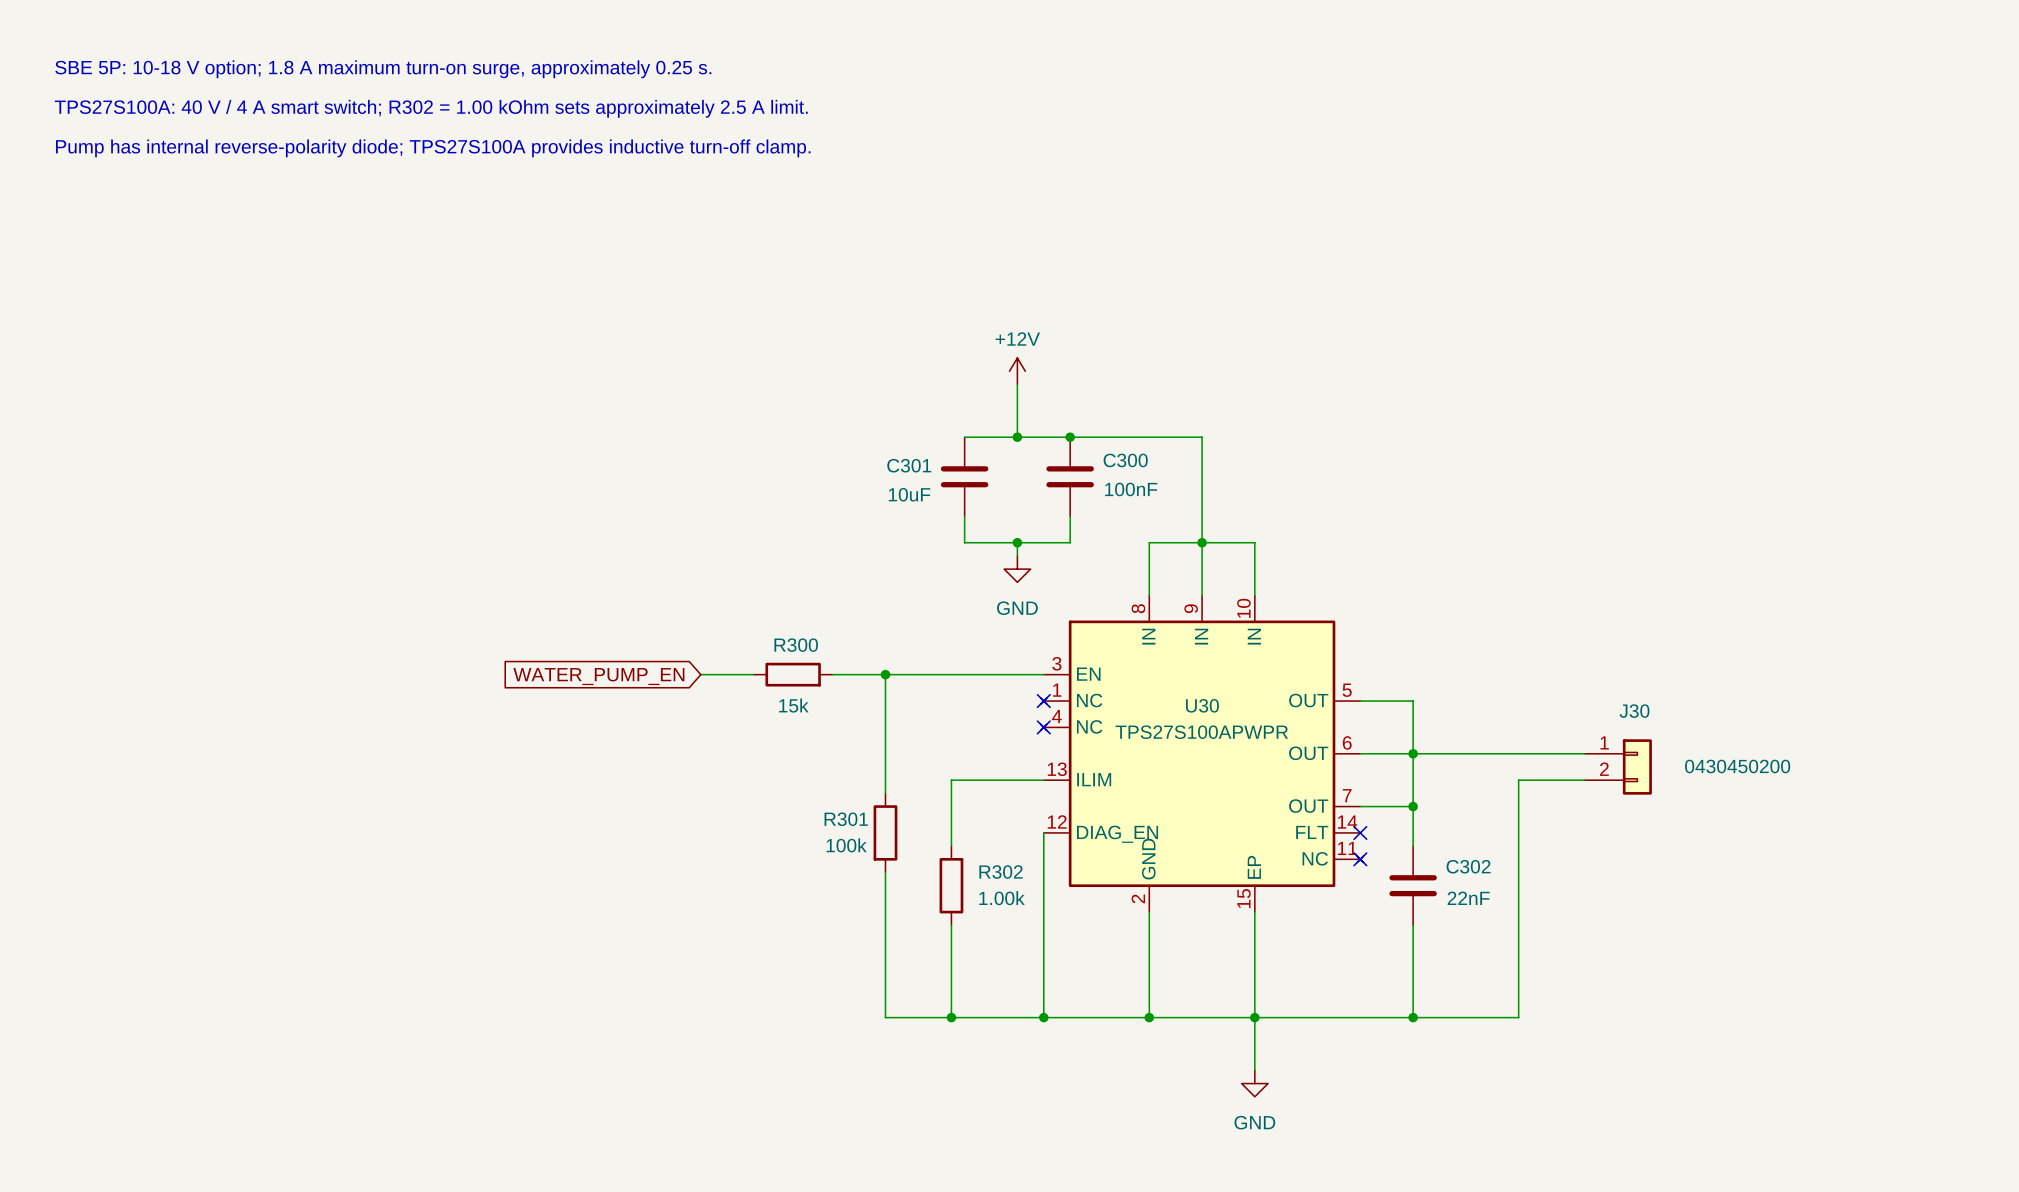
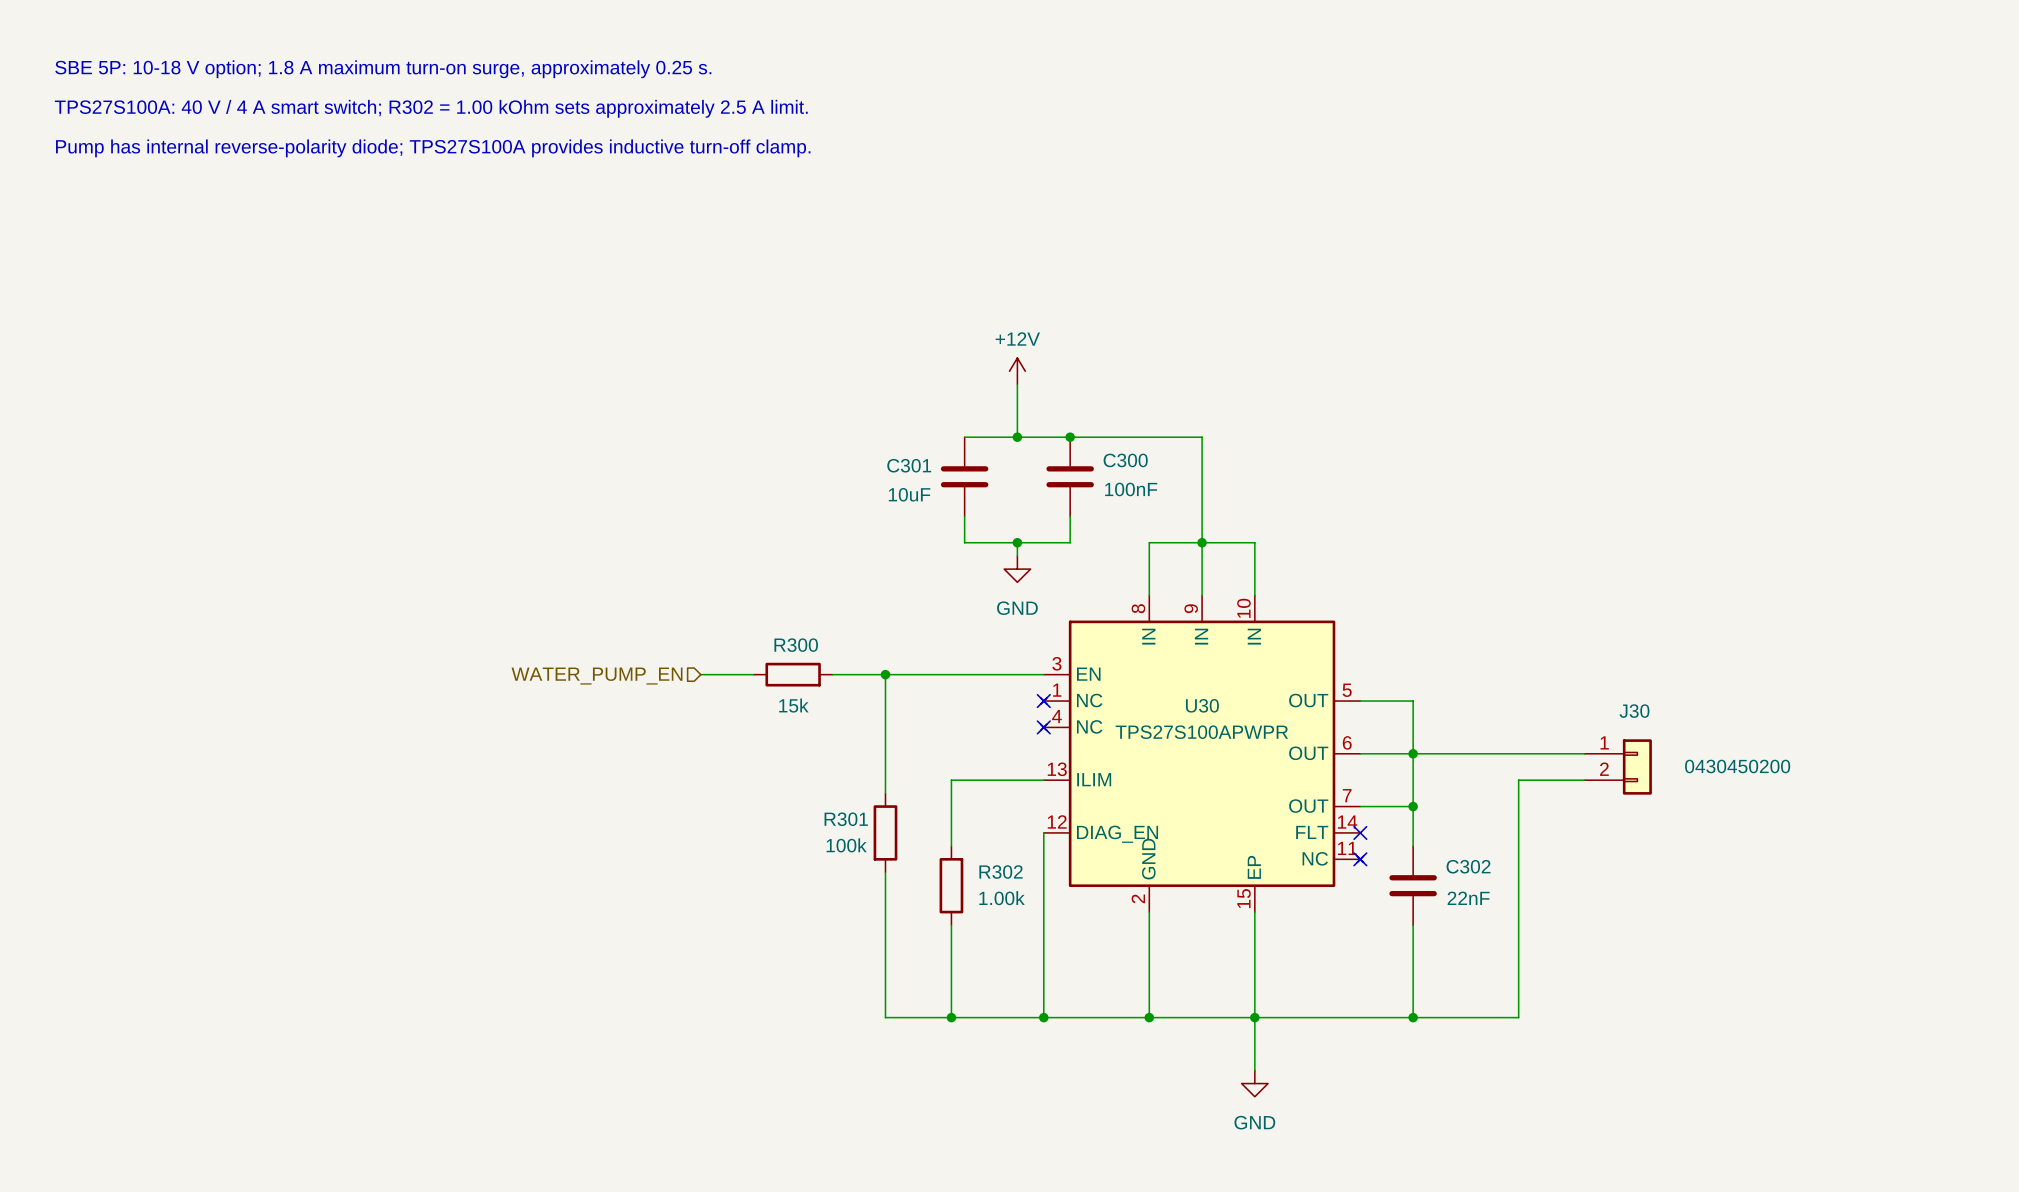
hierarchical label: none -> WATER_PUMP_EN (597, 676)
global label: WATER_PUMP_EN (598, 676) -> none

